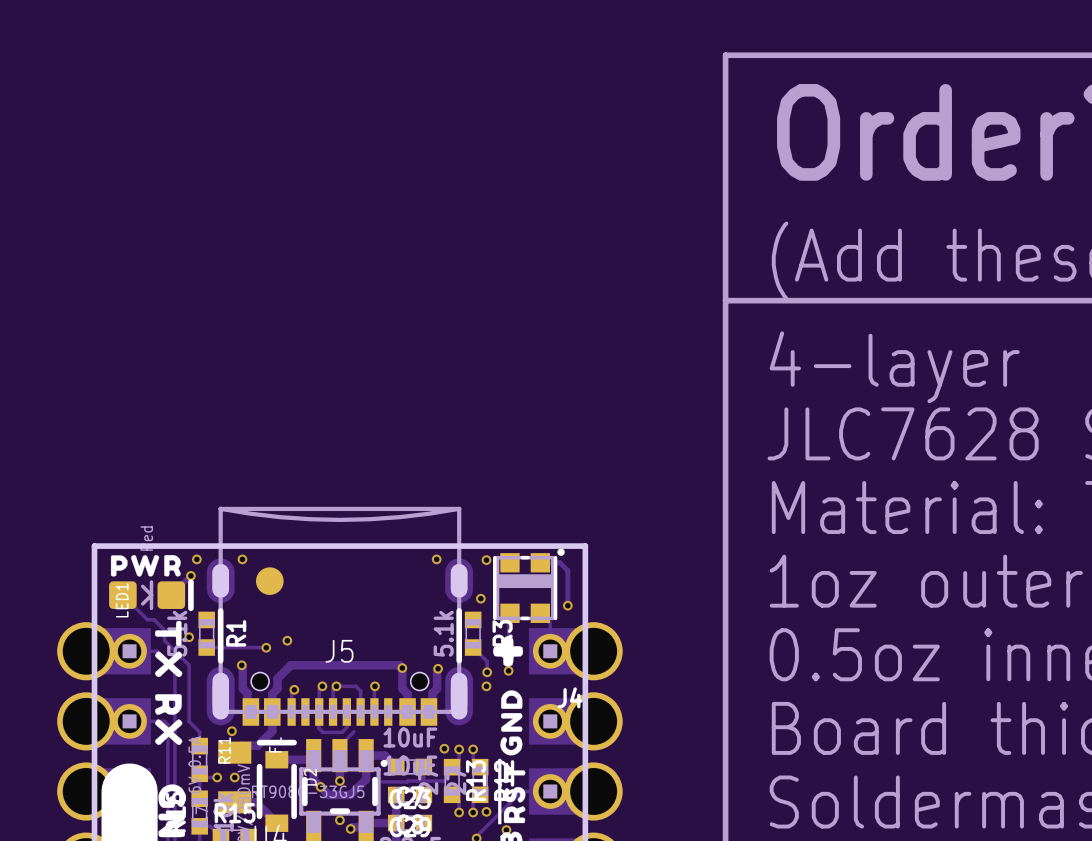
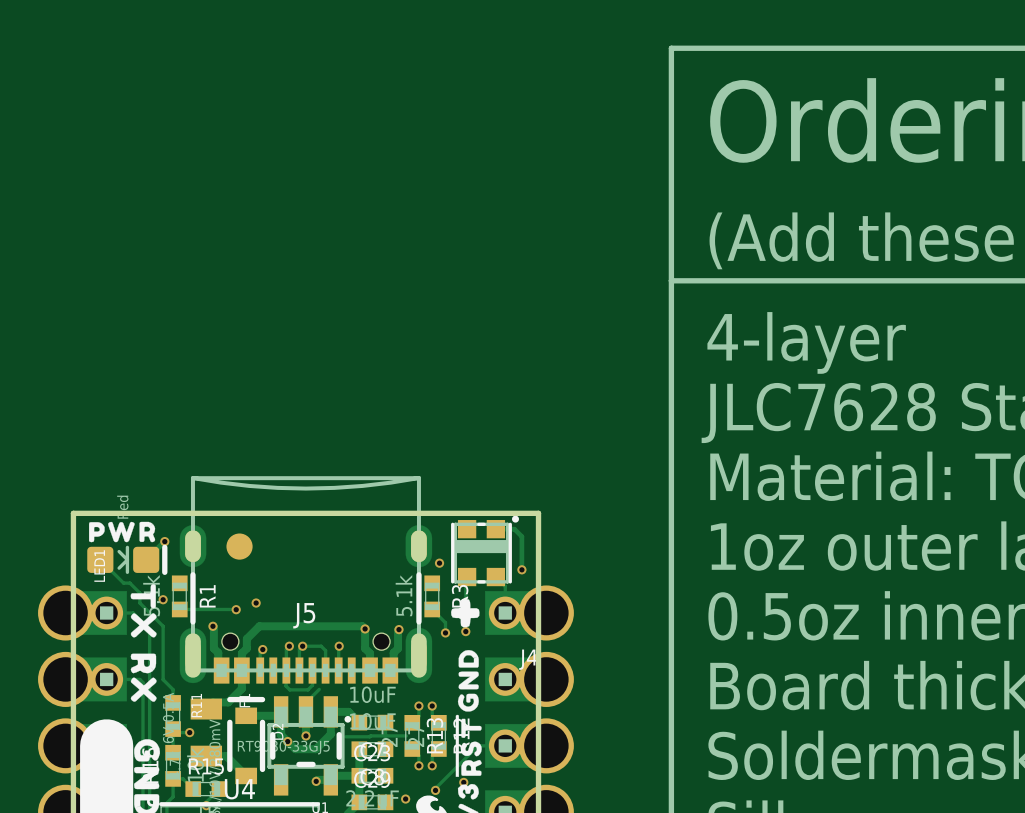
via: (196, 559) -> none
via: (242, 559) -> none
via: (436, 559) -> none
via: (486, 560) -> none
via: (486, 686) -> none
via: (231, 731) -> none
via: (444, 748) -> none
via: (234, 777) -> none
via: (486, 811) -> none
via: (339, 820) -> none

